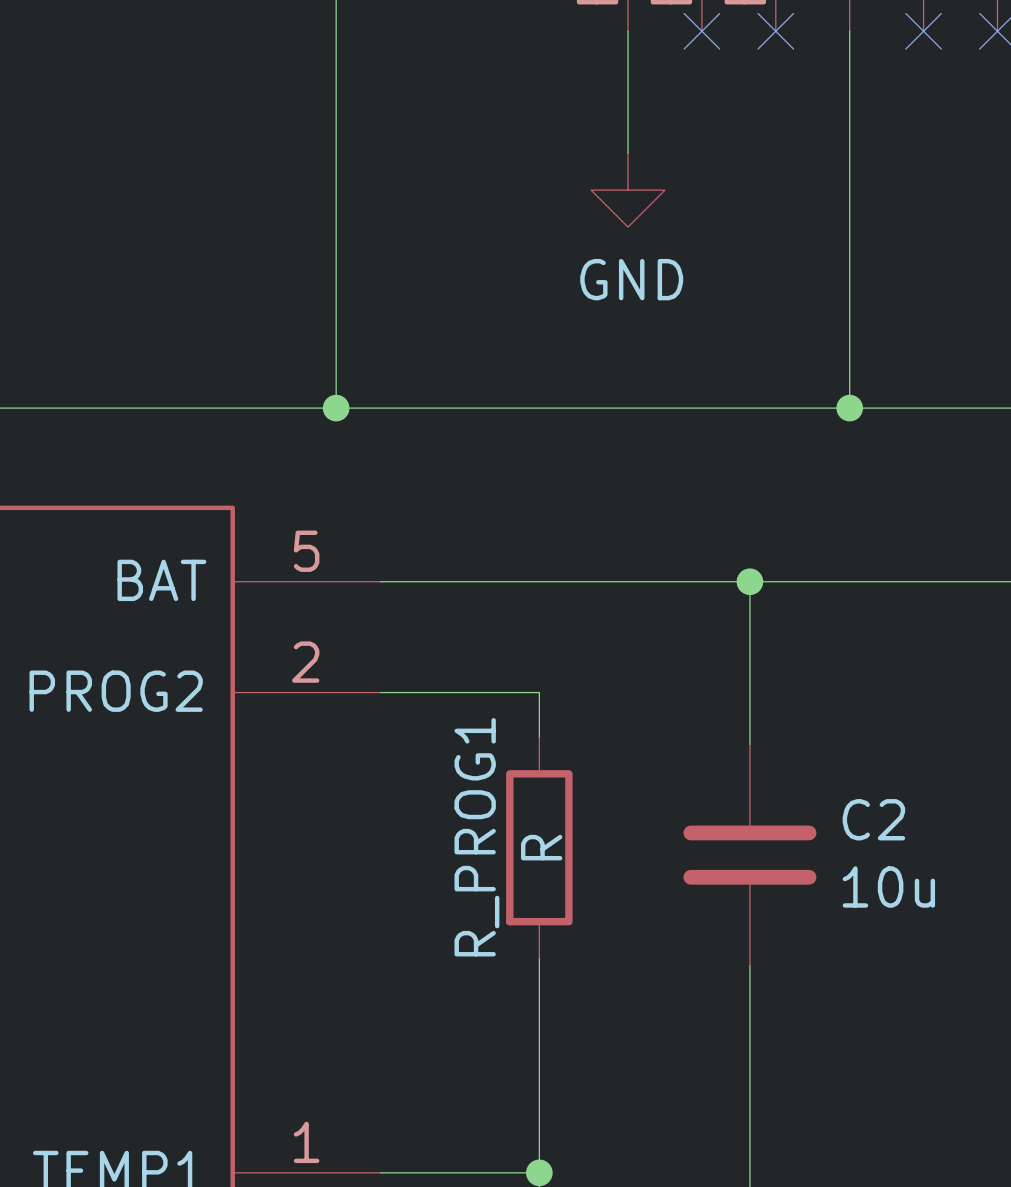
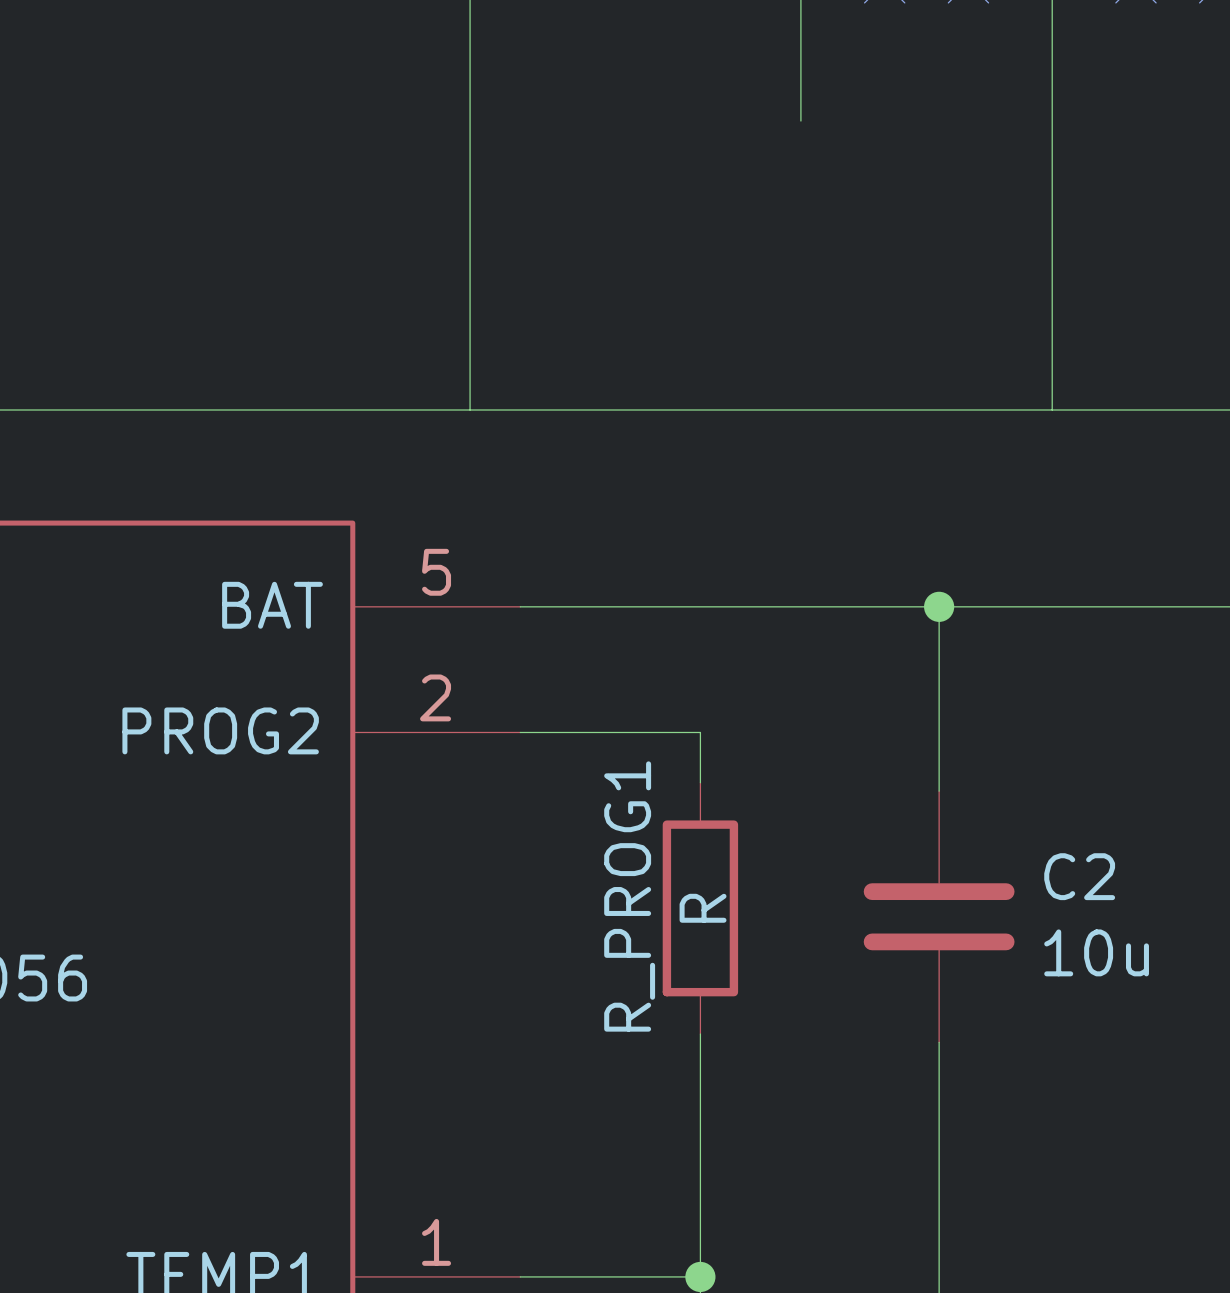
power symbol: GND (628, 190) -> none
junction: (336, 408) -> none
junction: (849, 408) -> none

